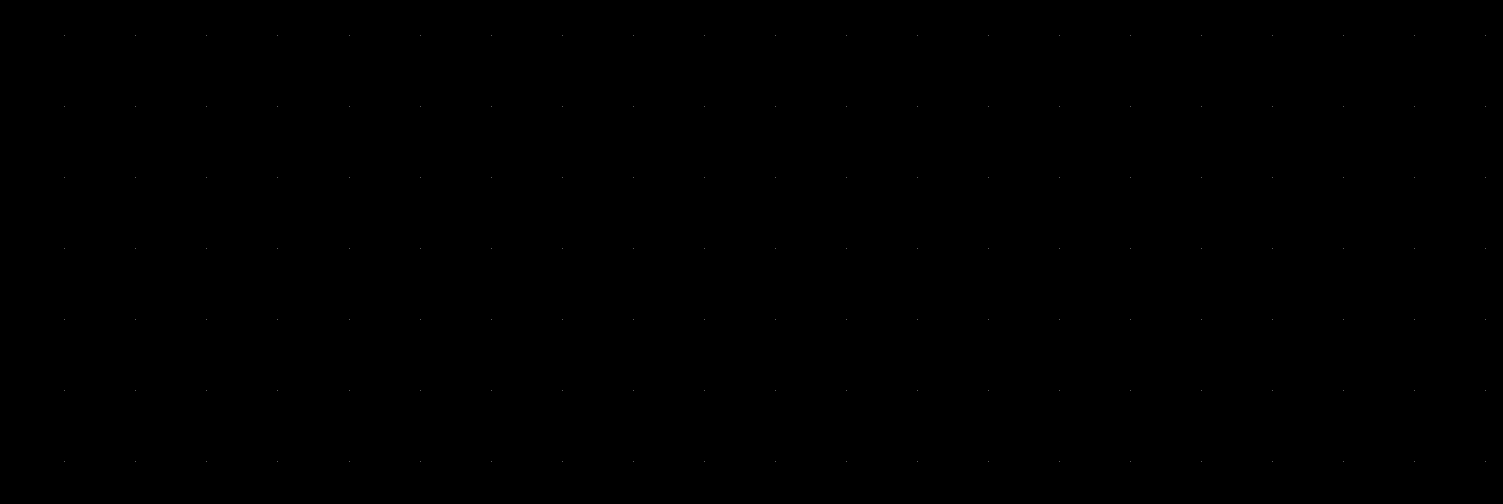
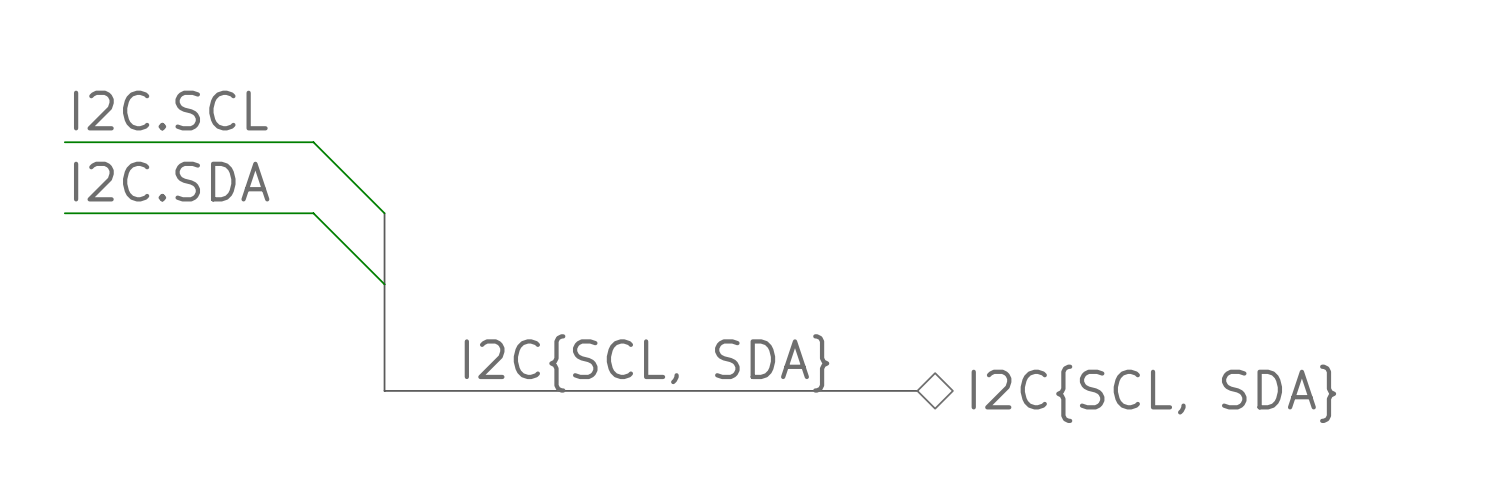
label: none -> I2C.SCL (170, 110)
wire: none -> (64, 142) (313, 142) (384, 213)
label: none -> I2C.SDA (171, 181)
wire: none -> (64, 213) (313, 213) (384, 284)
bus: none -> (384, 213) (384, 390) (917, 390)
label: none -> I2C{SCL, SDA} (646, 363)
hierarchical label: none -> I2C{SCL, SDA} (1153, 393)

